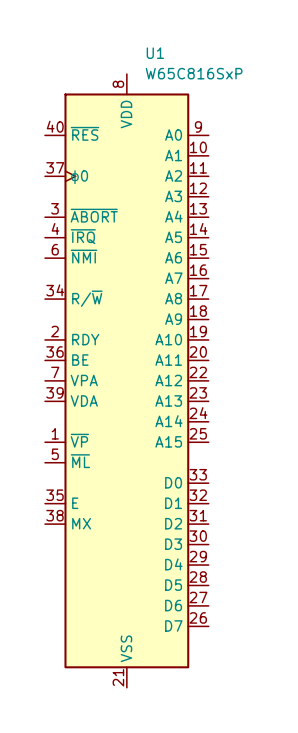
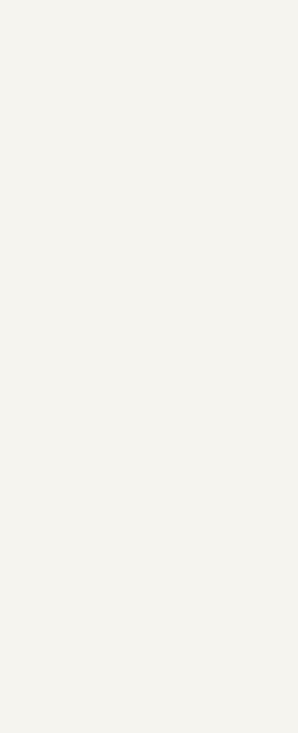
U1: W65C816SxP (126, 380) -> none

